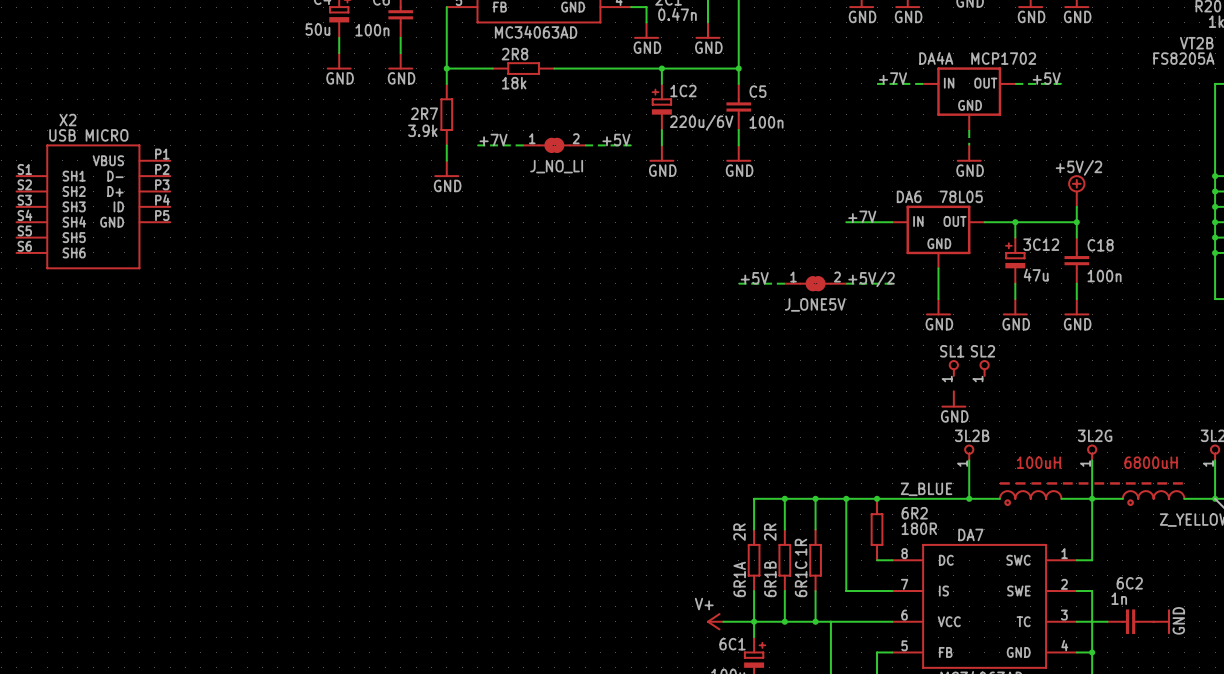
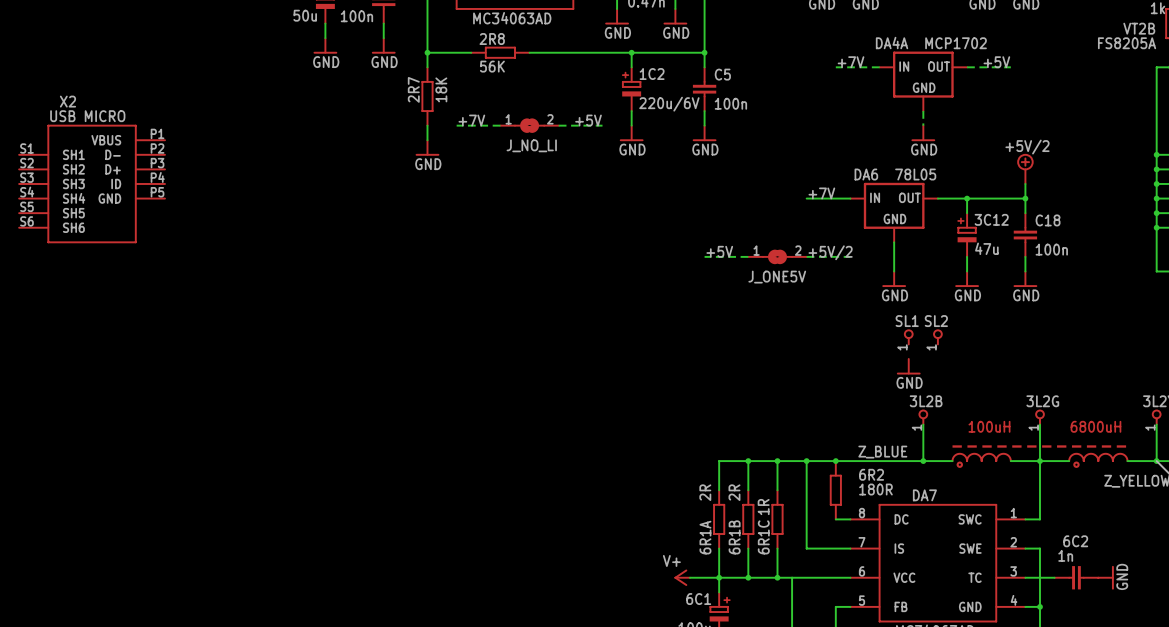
2R8 value: 18k (514, 83) -> 56K (492, 66)
2R7 name rotation: 0° (424, 113) -> 90° counterclockwise (413, 89)
2R7 value: 3.9k (422, 130) -> 18K (441, 89)

